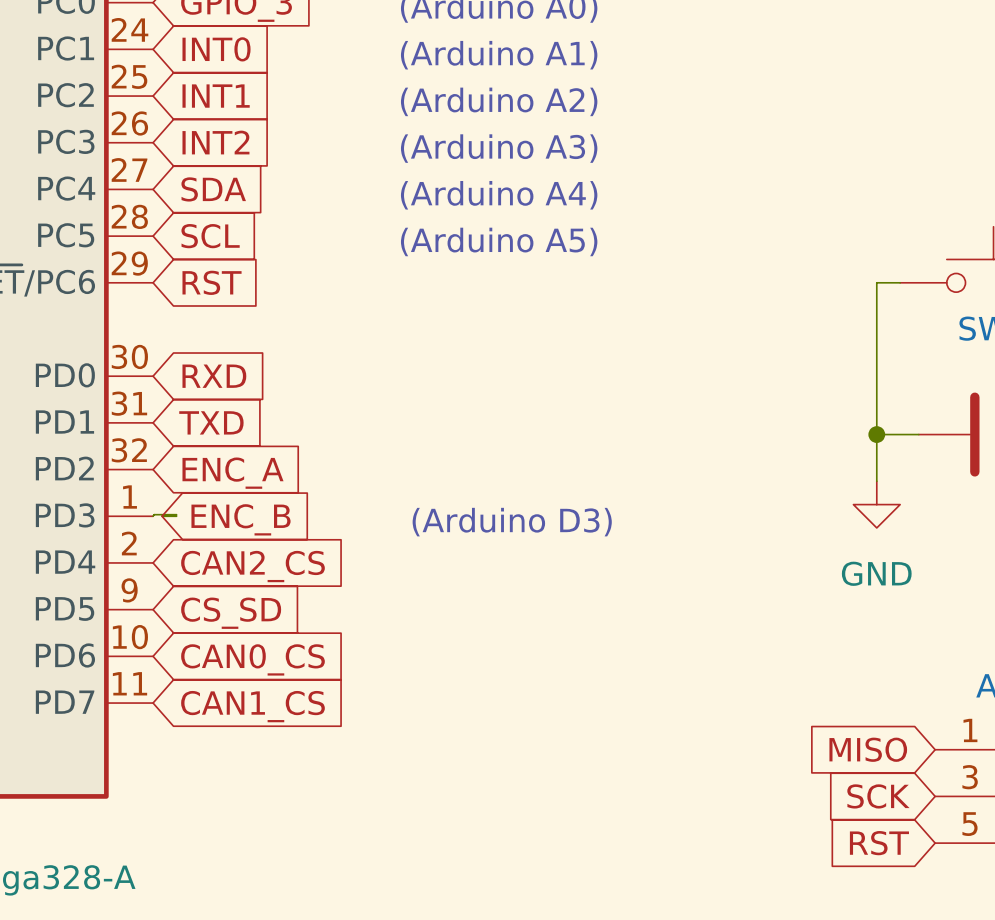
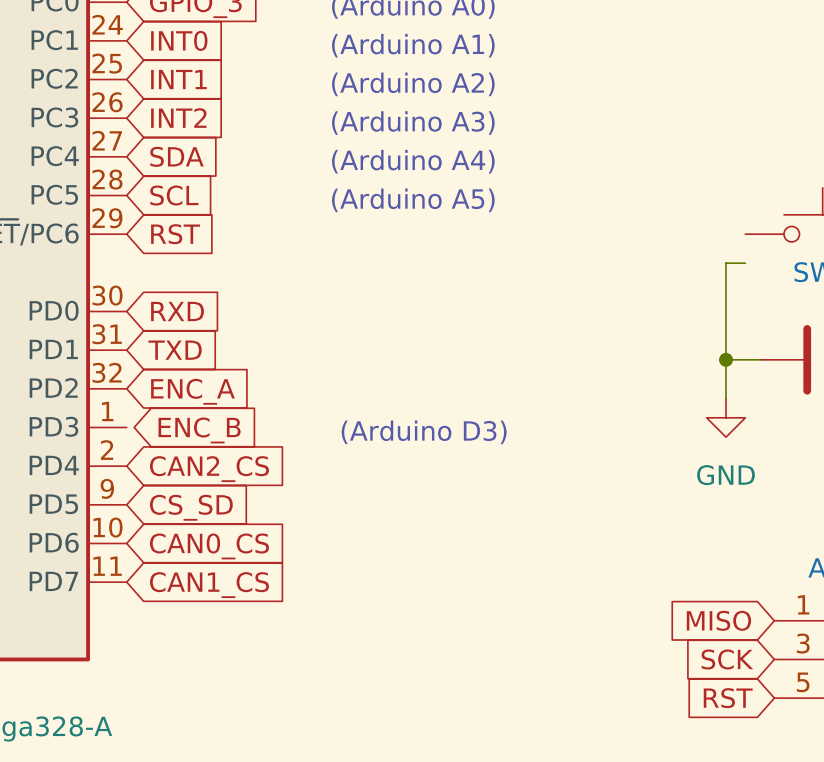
wire: (900, 282) (876, 282) (876, 317) -> (745, 263) (726, 263)
wire: (153, 516) (176, 514) (176, 516) (162, 516) -> none

